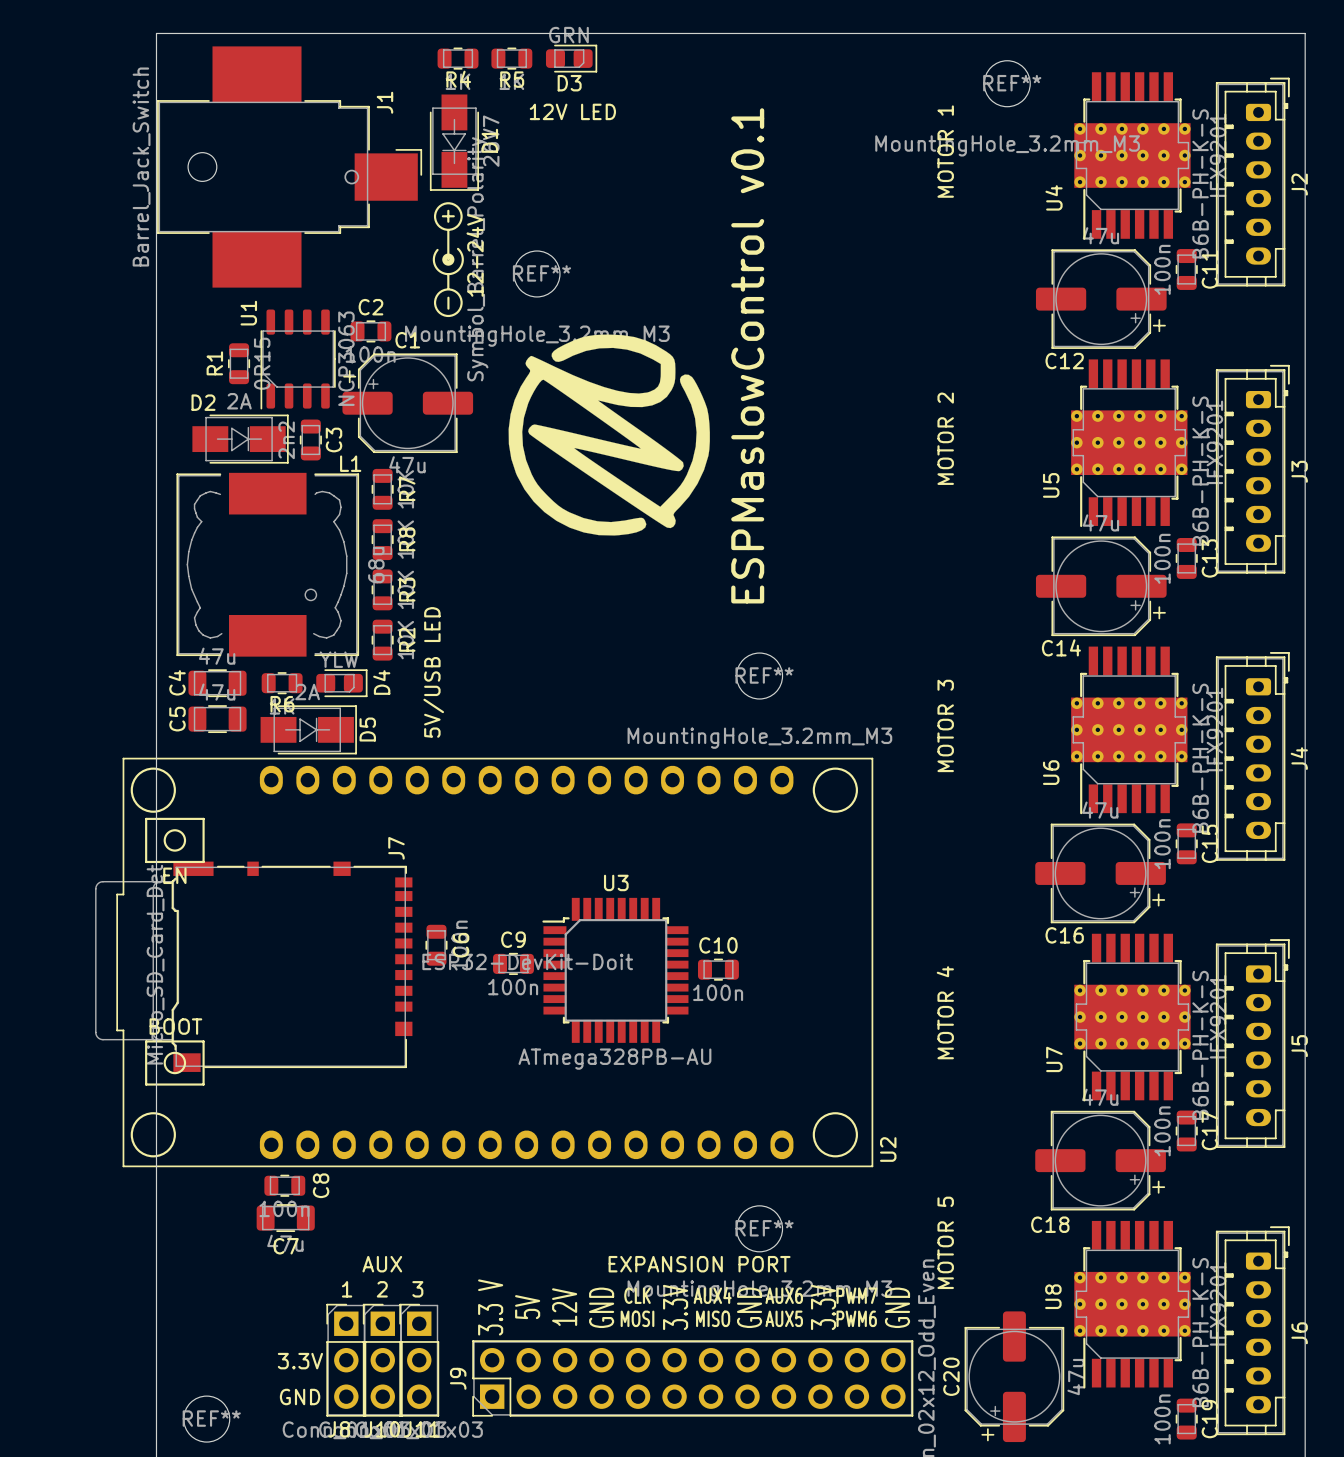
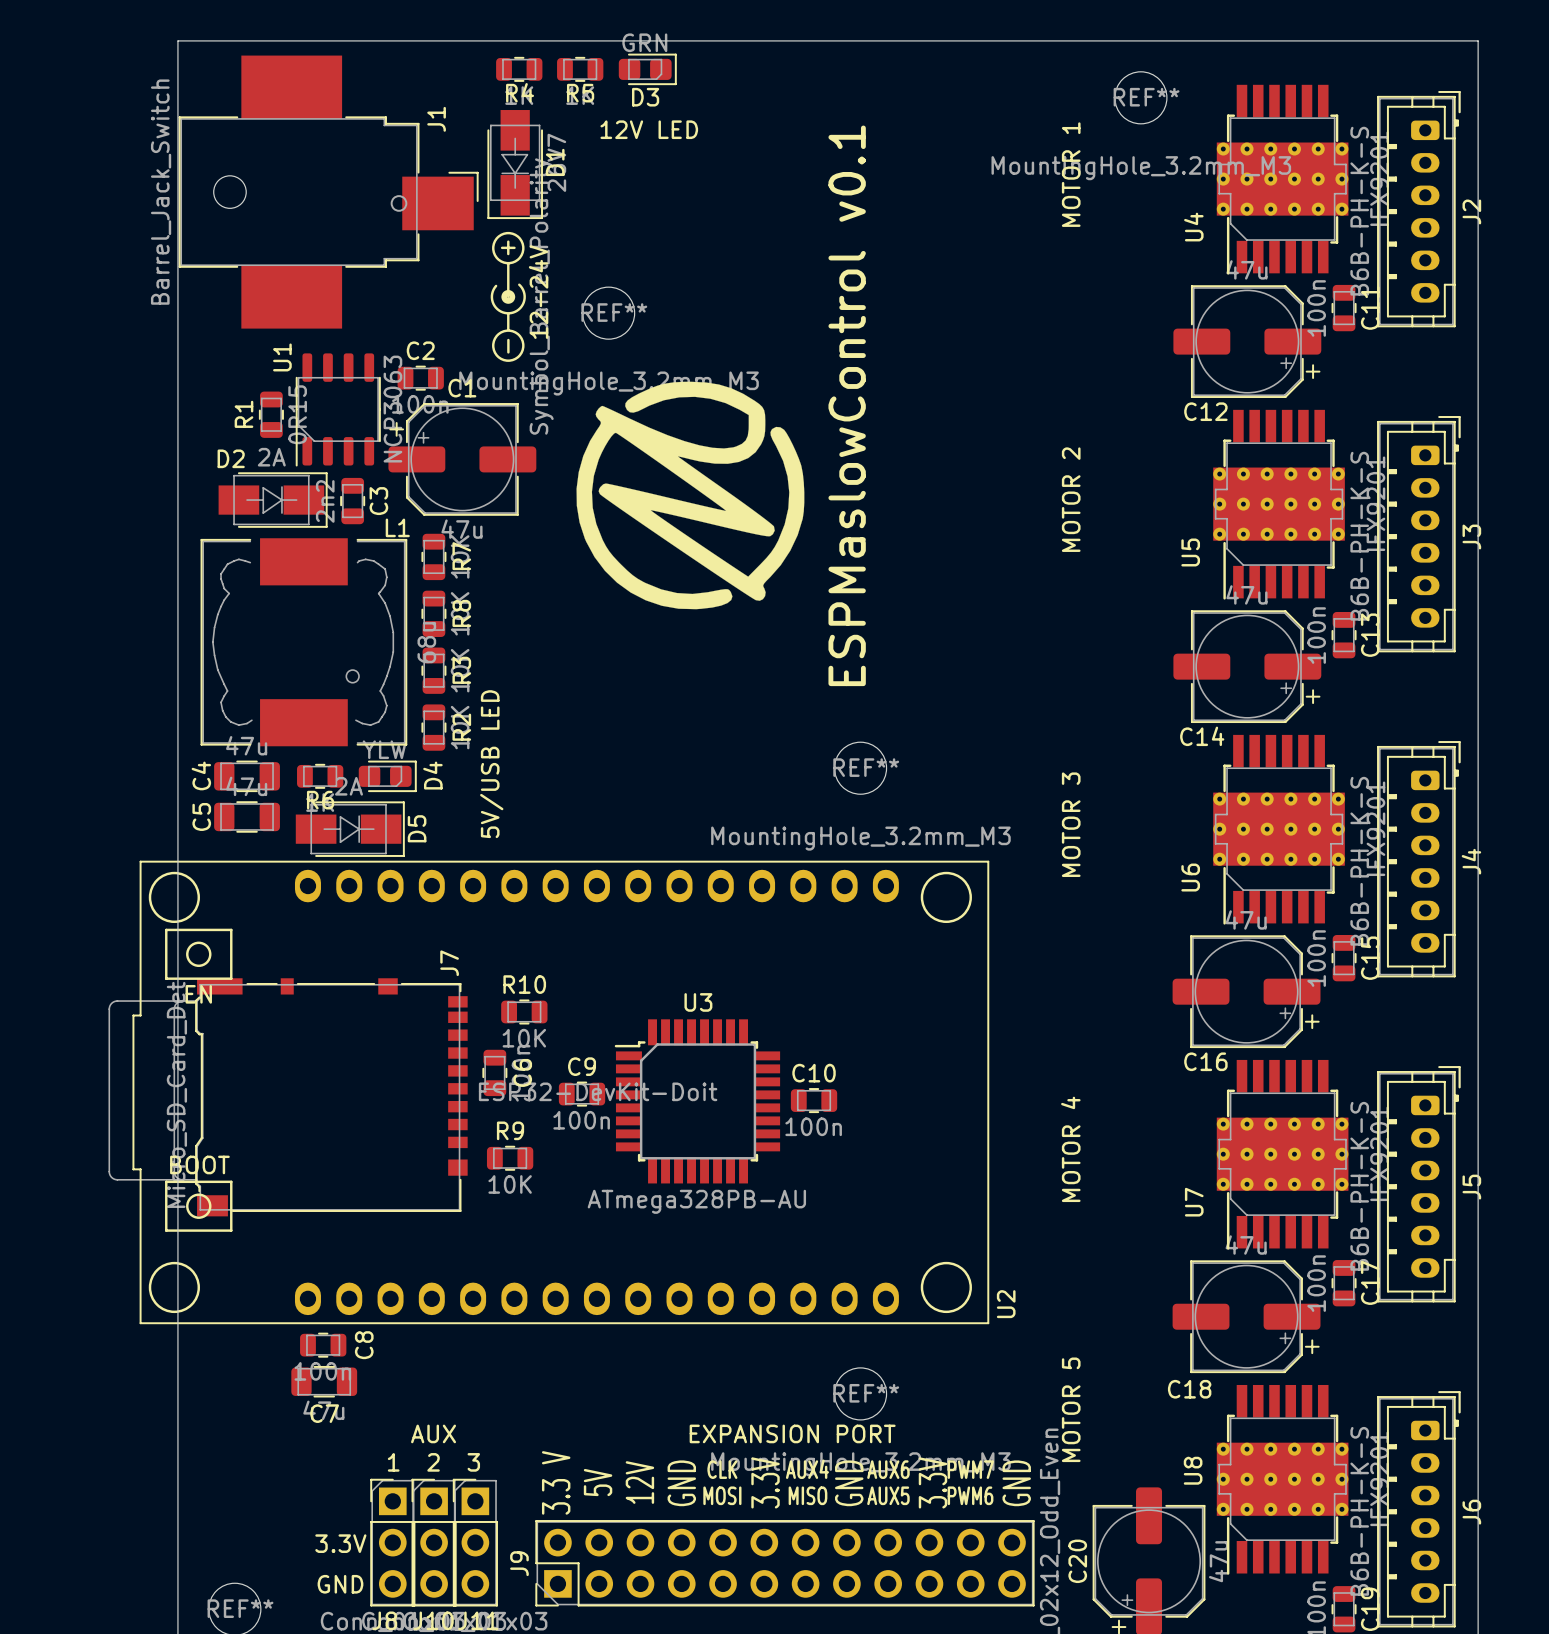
R10: none -> 10K (524, 1011)
R9: none -> 10K (510, 1158)

